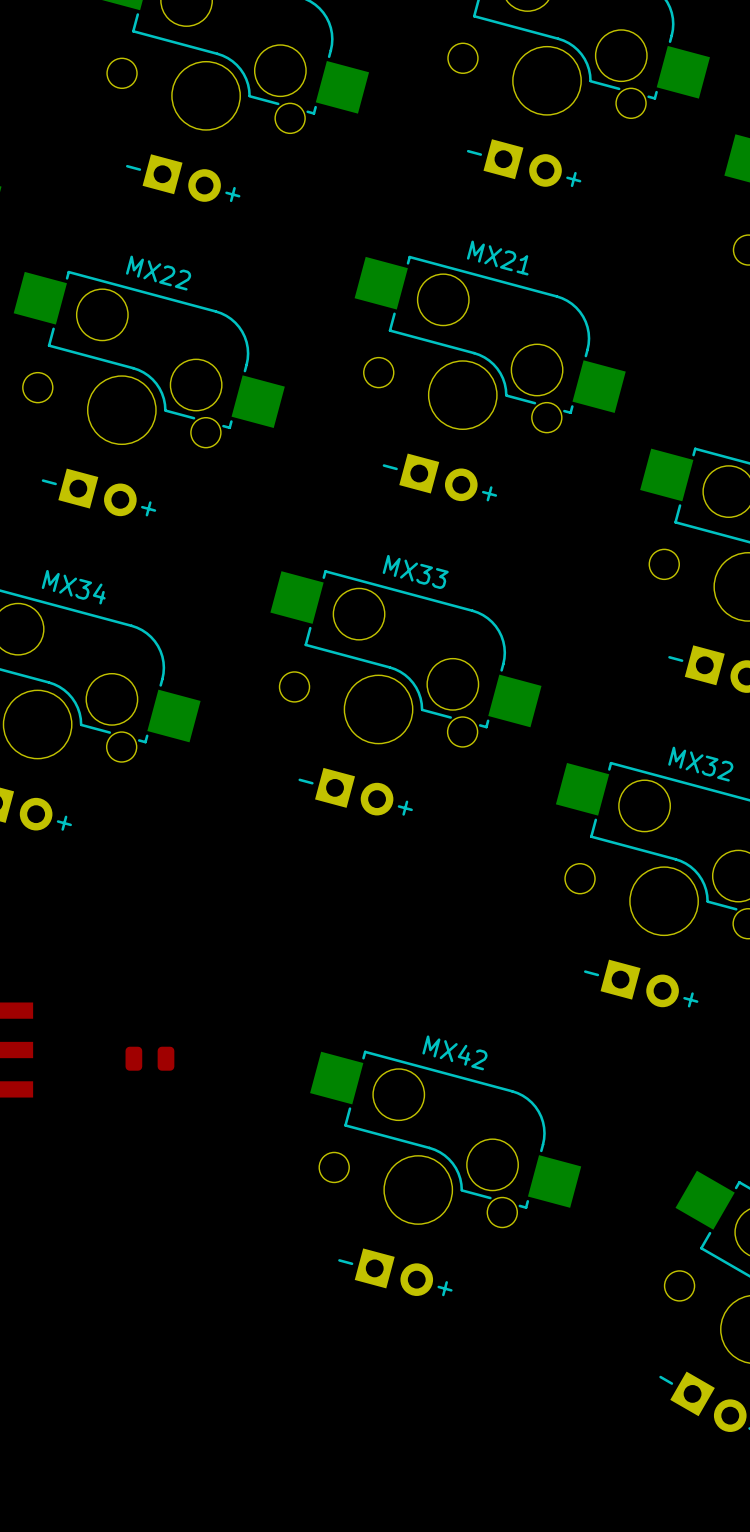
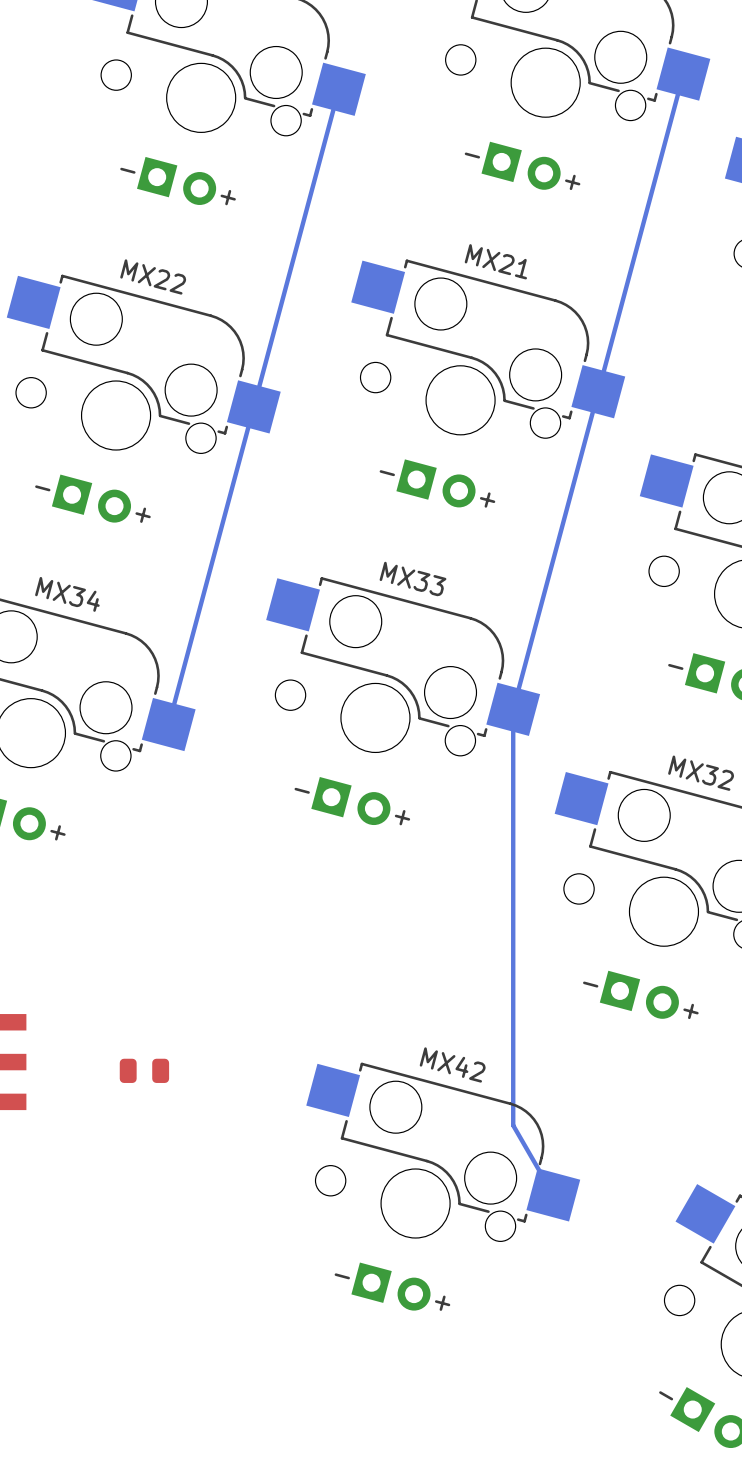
bottom track: none -> (683, 74) (513, 709) (513, 1125) (553, 1194)
bottom track: none -> (338, 89) (168, 724)

